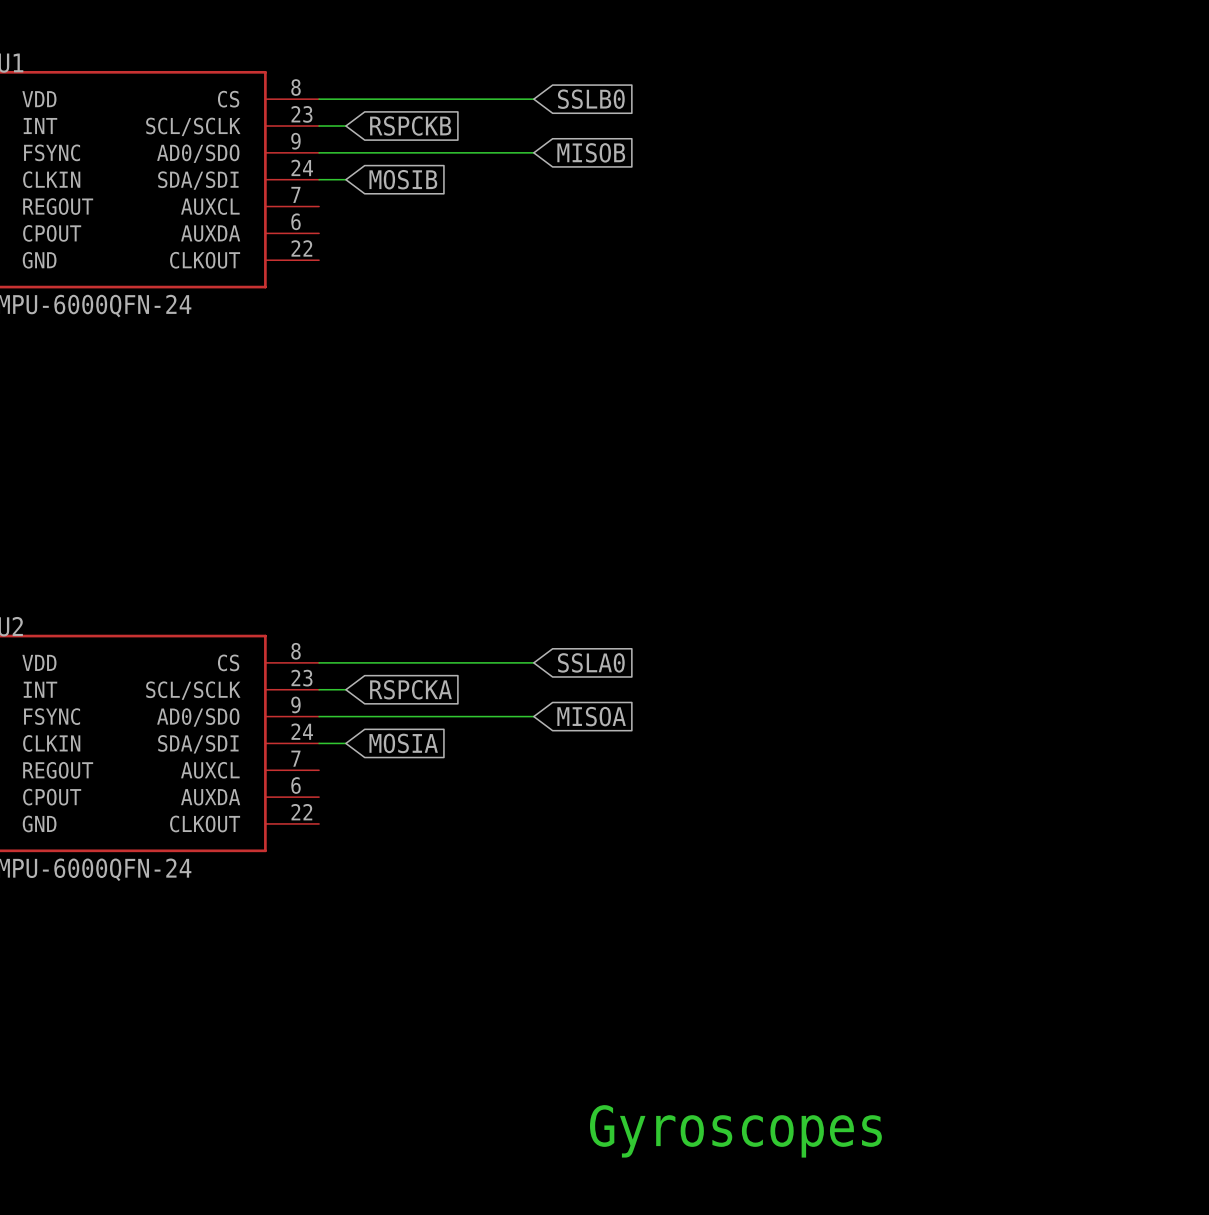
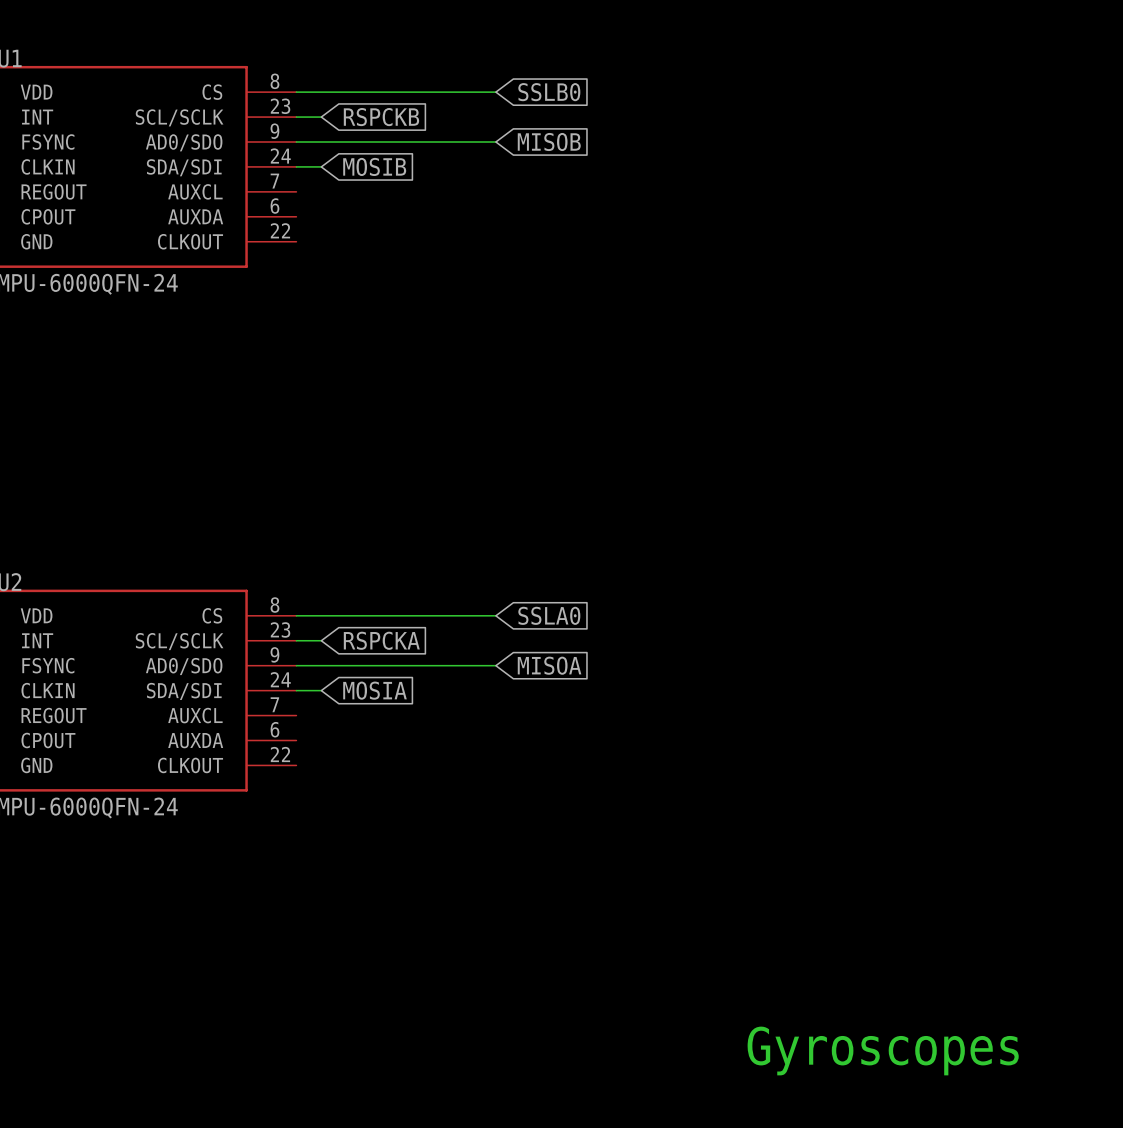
text position: Gyroscopes (735, 1131) -> Gyroscopes (883, 1050)

